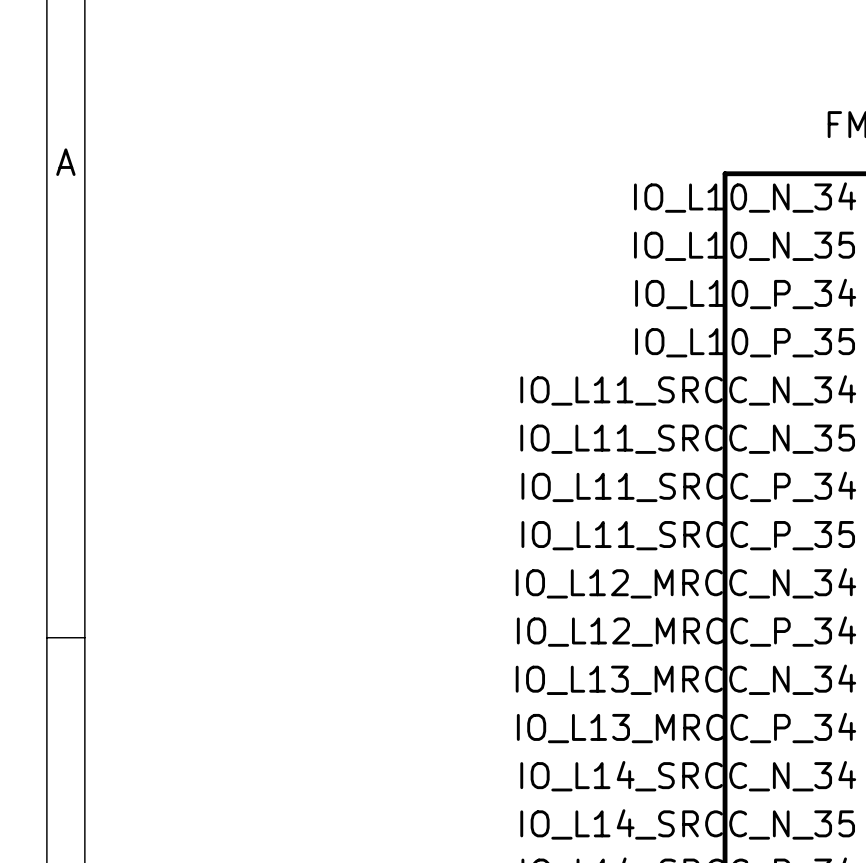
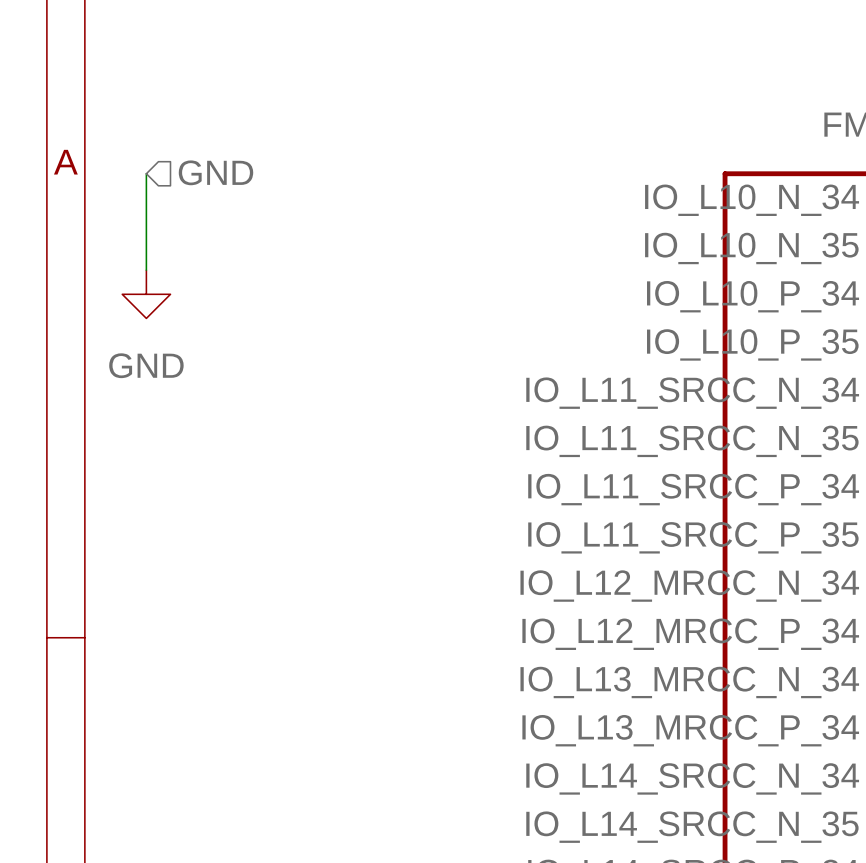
hierarchical label: none -> GND (215, 172)
wire: none -> (146, 173) (146, 270)
power symbol: none -> GND (146, 294)

